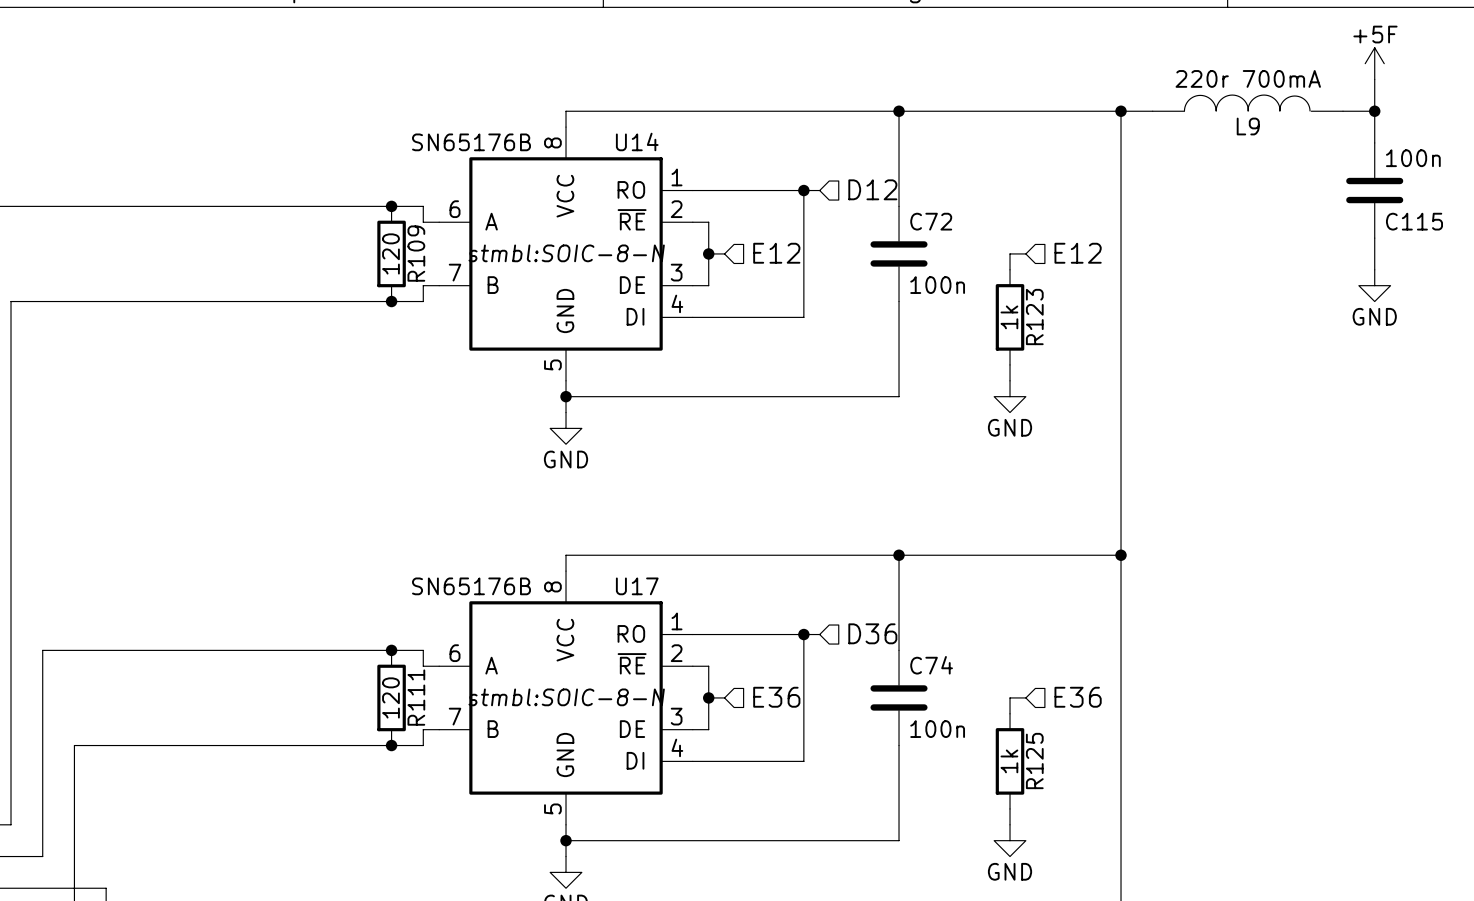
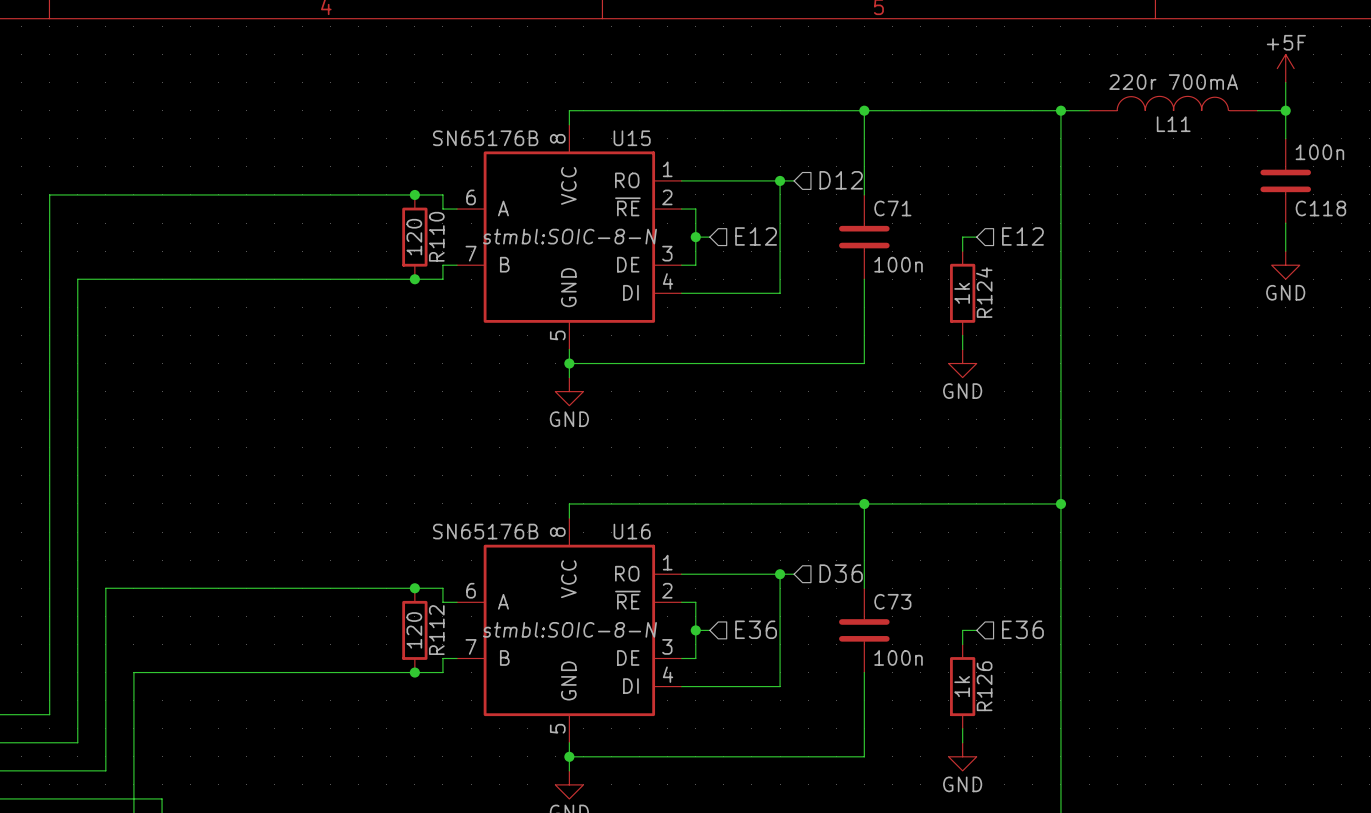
L9 name: L9 (1248, 126) -> L11 (1173, 124)
U14 name: U14 (637, 141) -> U15 (632, 138)
C72 name: C72 (931, 221) -> C71 (892, 208)
C115 name: C115 (1414, 221) -> C118 (1320, 208)
R109 name: R109 (416, 253) -> R110 (436, 236)
R123 name: R123 (1034, 317) -> R124 (984, 292)
U17 name: U17 (637, 586) -> U16 (632, 531)
C74 name: C74 (931, 665) -> C73 (892, 601)
R111 name: R111 (416, 697) -> R112 (436, 630)
R125 name: R125 (1034, 761) -> R126 (984, 686)

